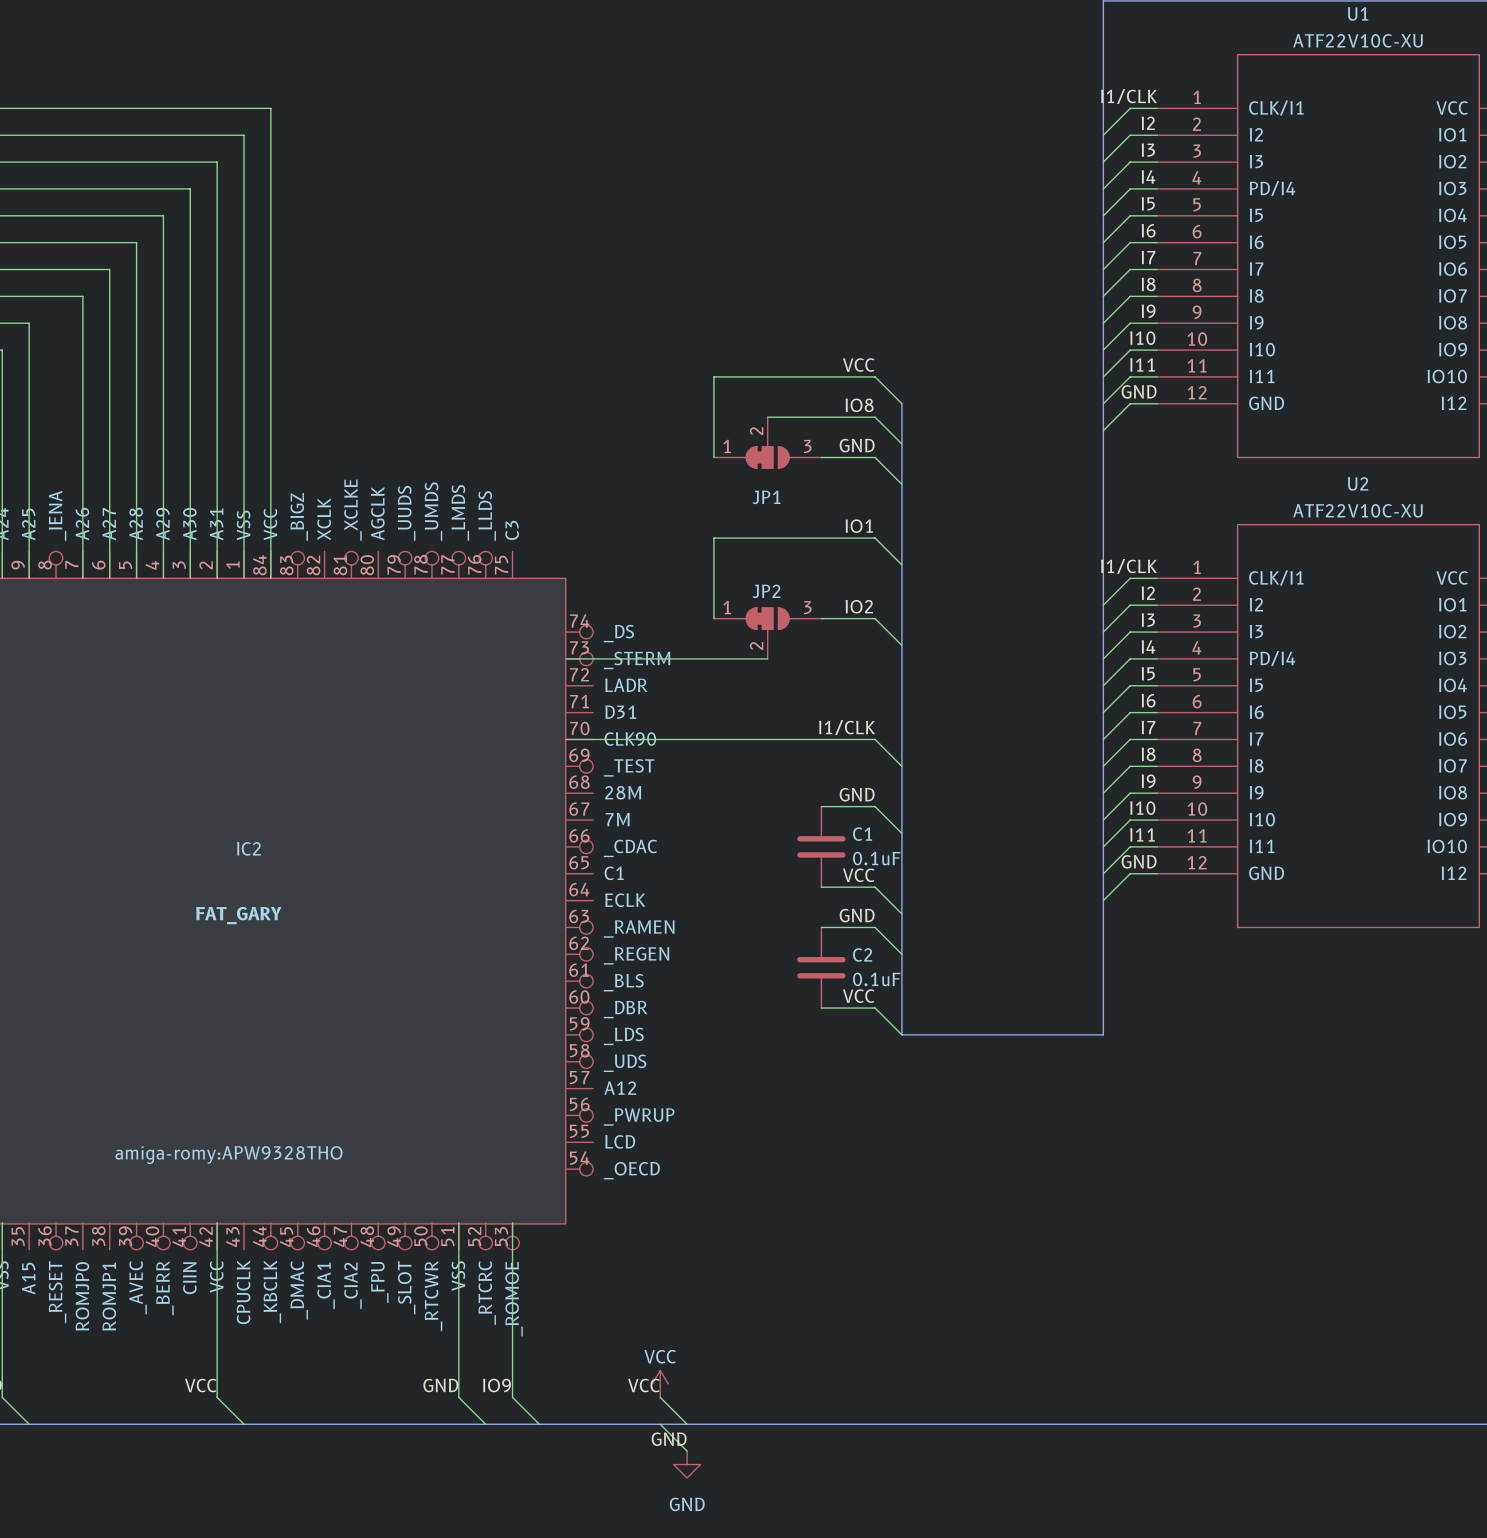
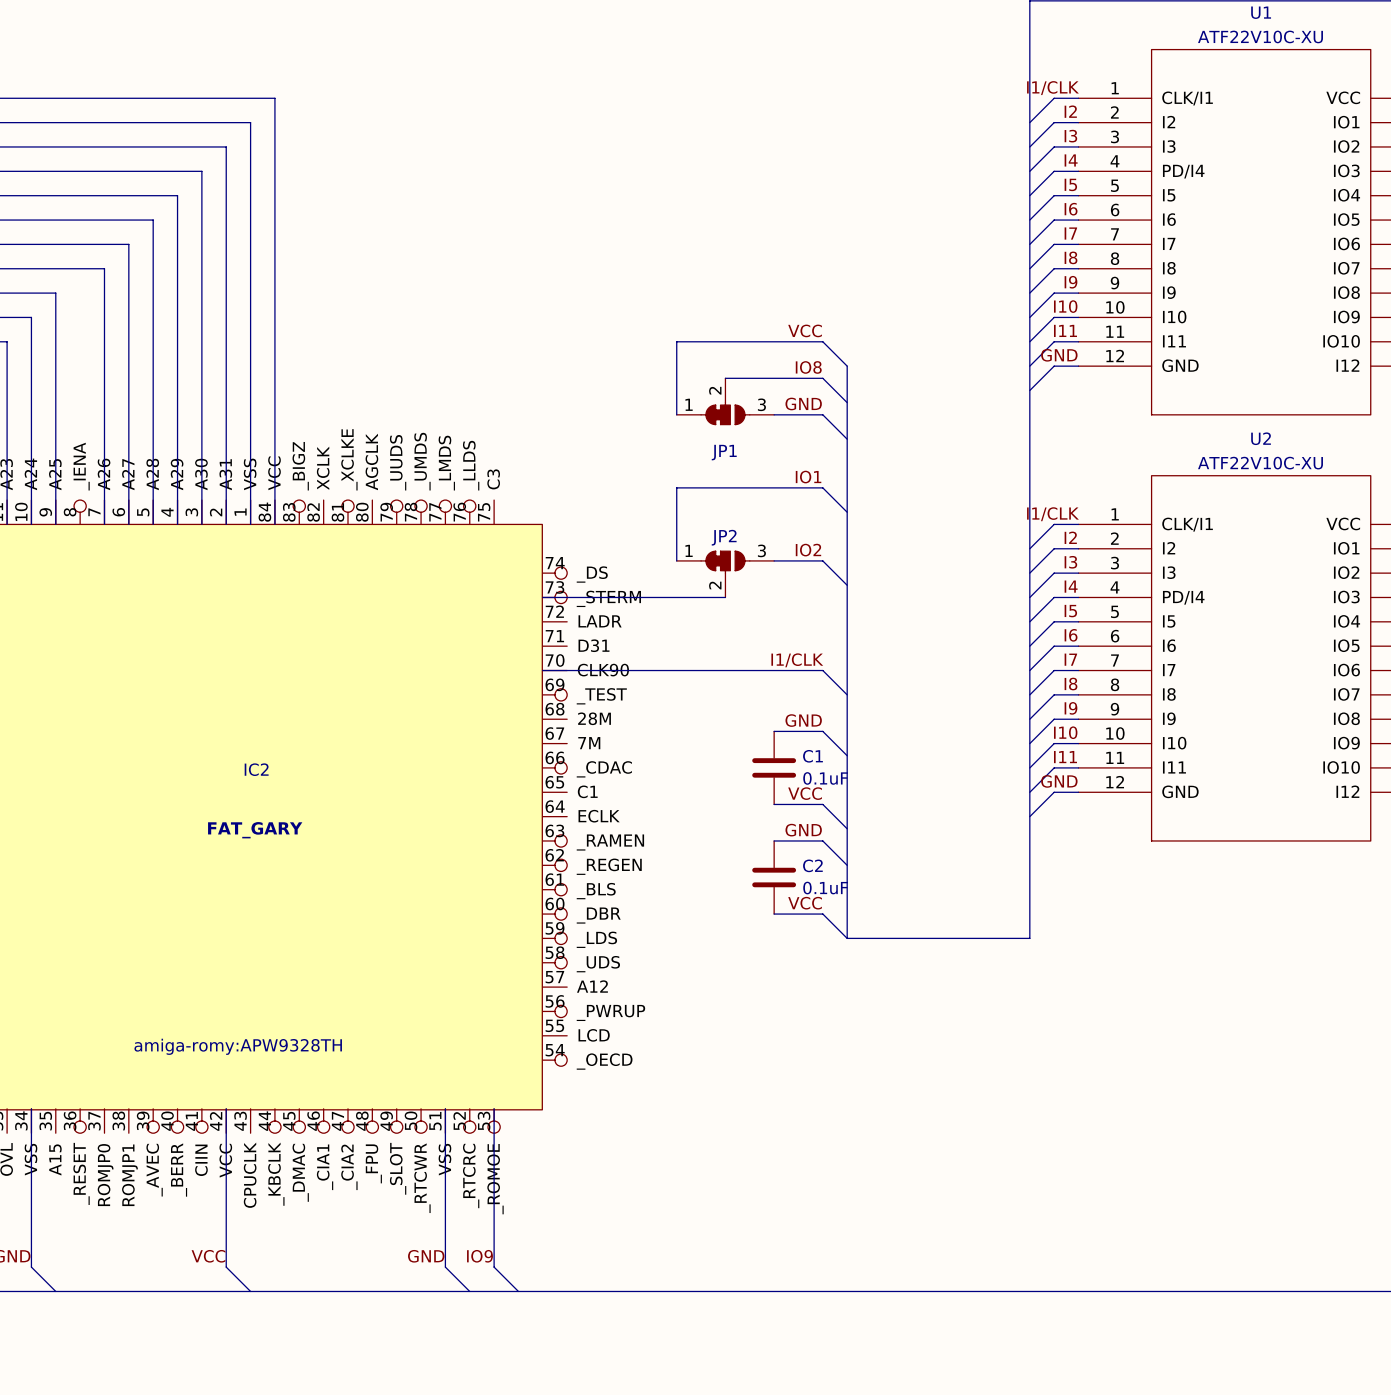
IC2 text: amiga-romy:APW9328THO (228, 1155) -> amiga-romy:APW9328TH (238, 1046)
power symbol: VCC (660, 1383) -> none
label: VCC (643, 1385) -> none
wire: (660, 1397) (687, 1424) -> none
wire: (660, 1424) (687, 1451) -> none
label: GND (669, 1439) -> none
power symbol: GND (687, 1464) -> none

